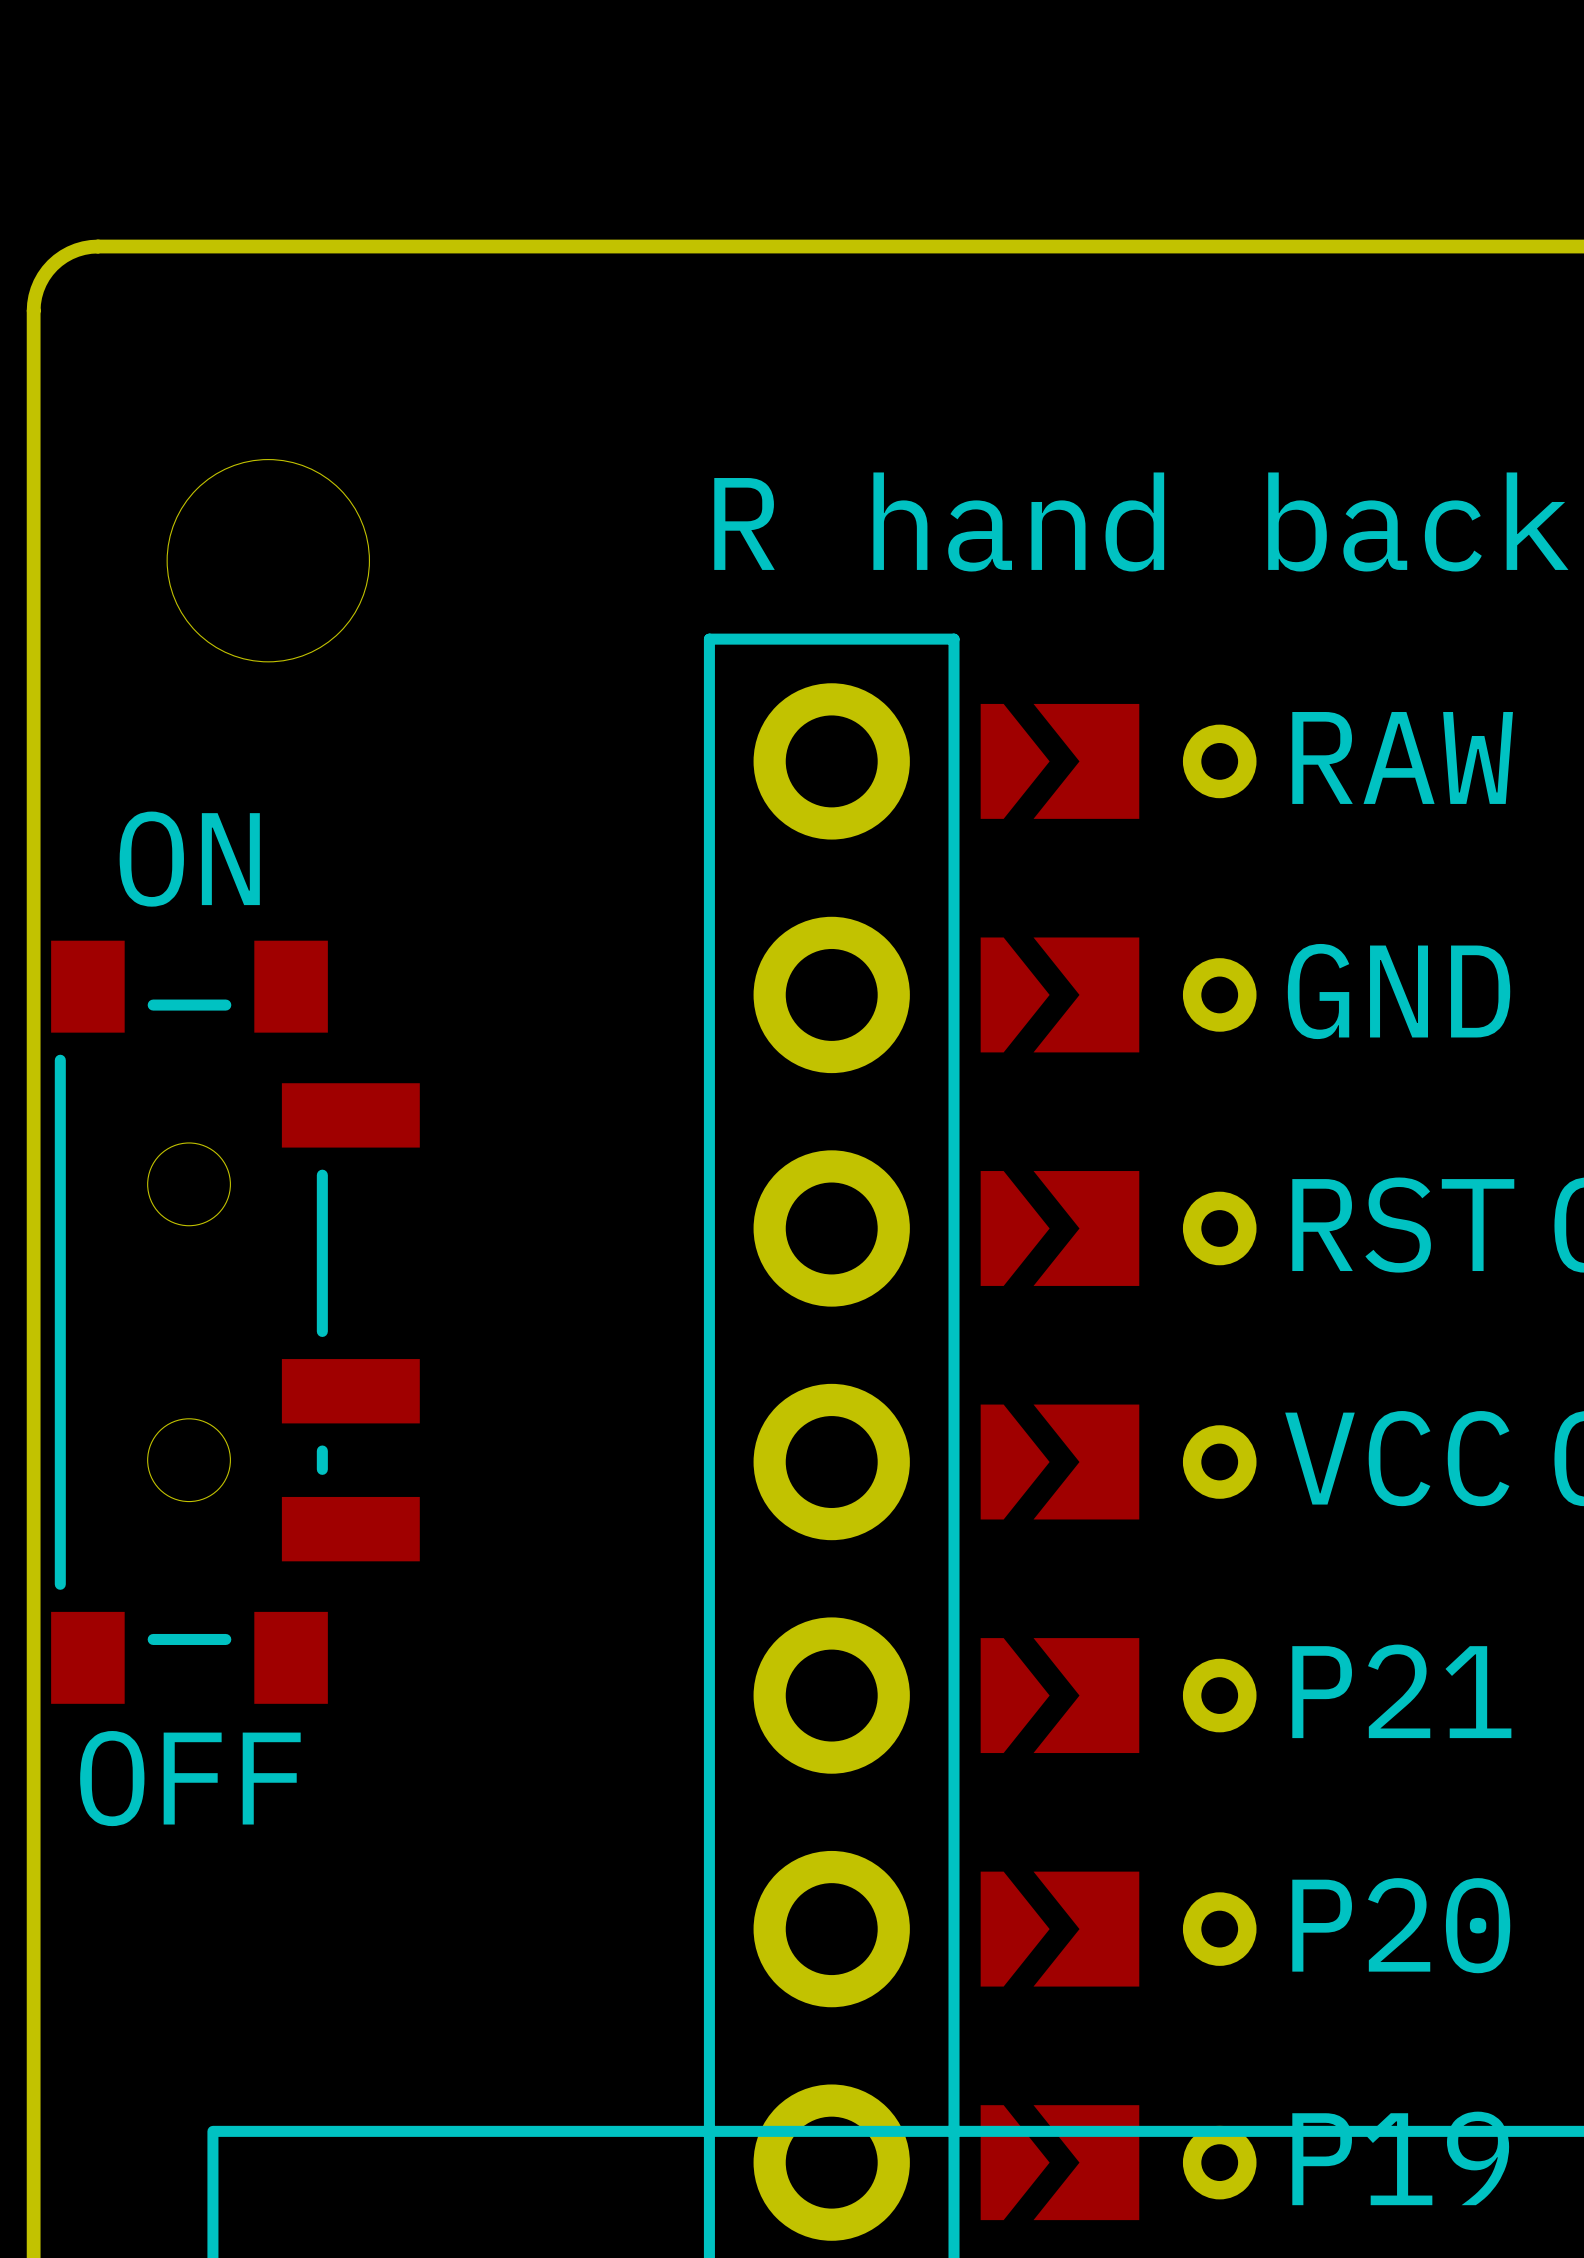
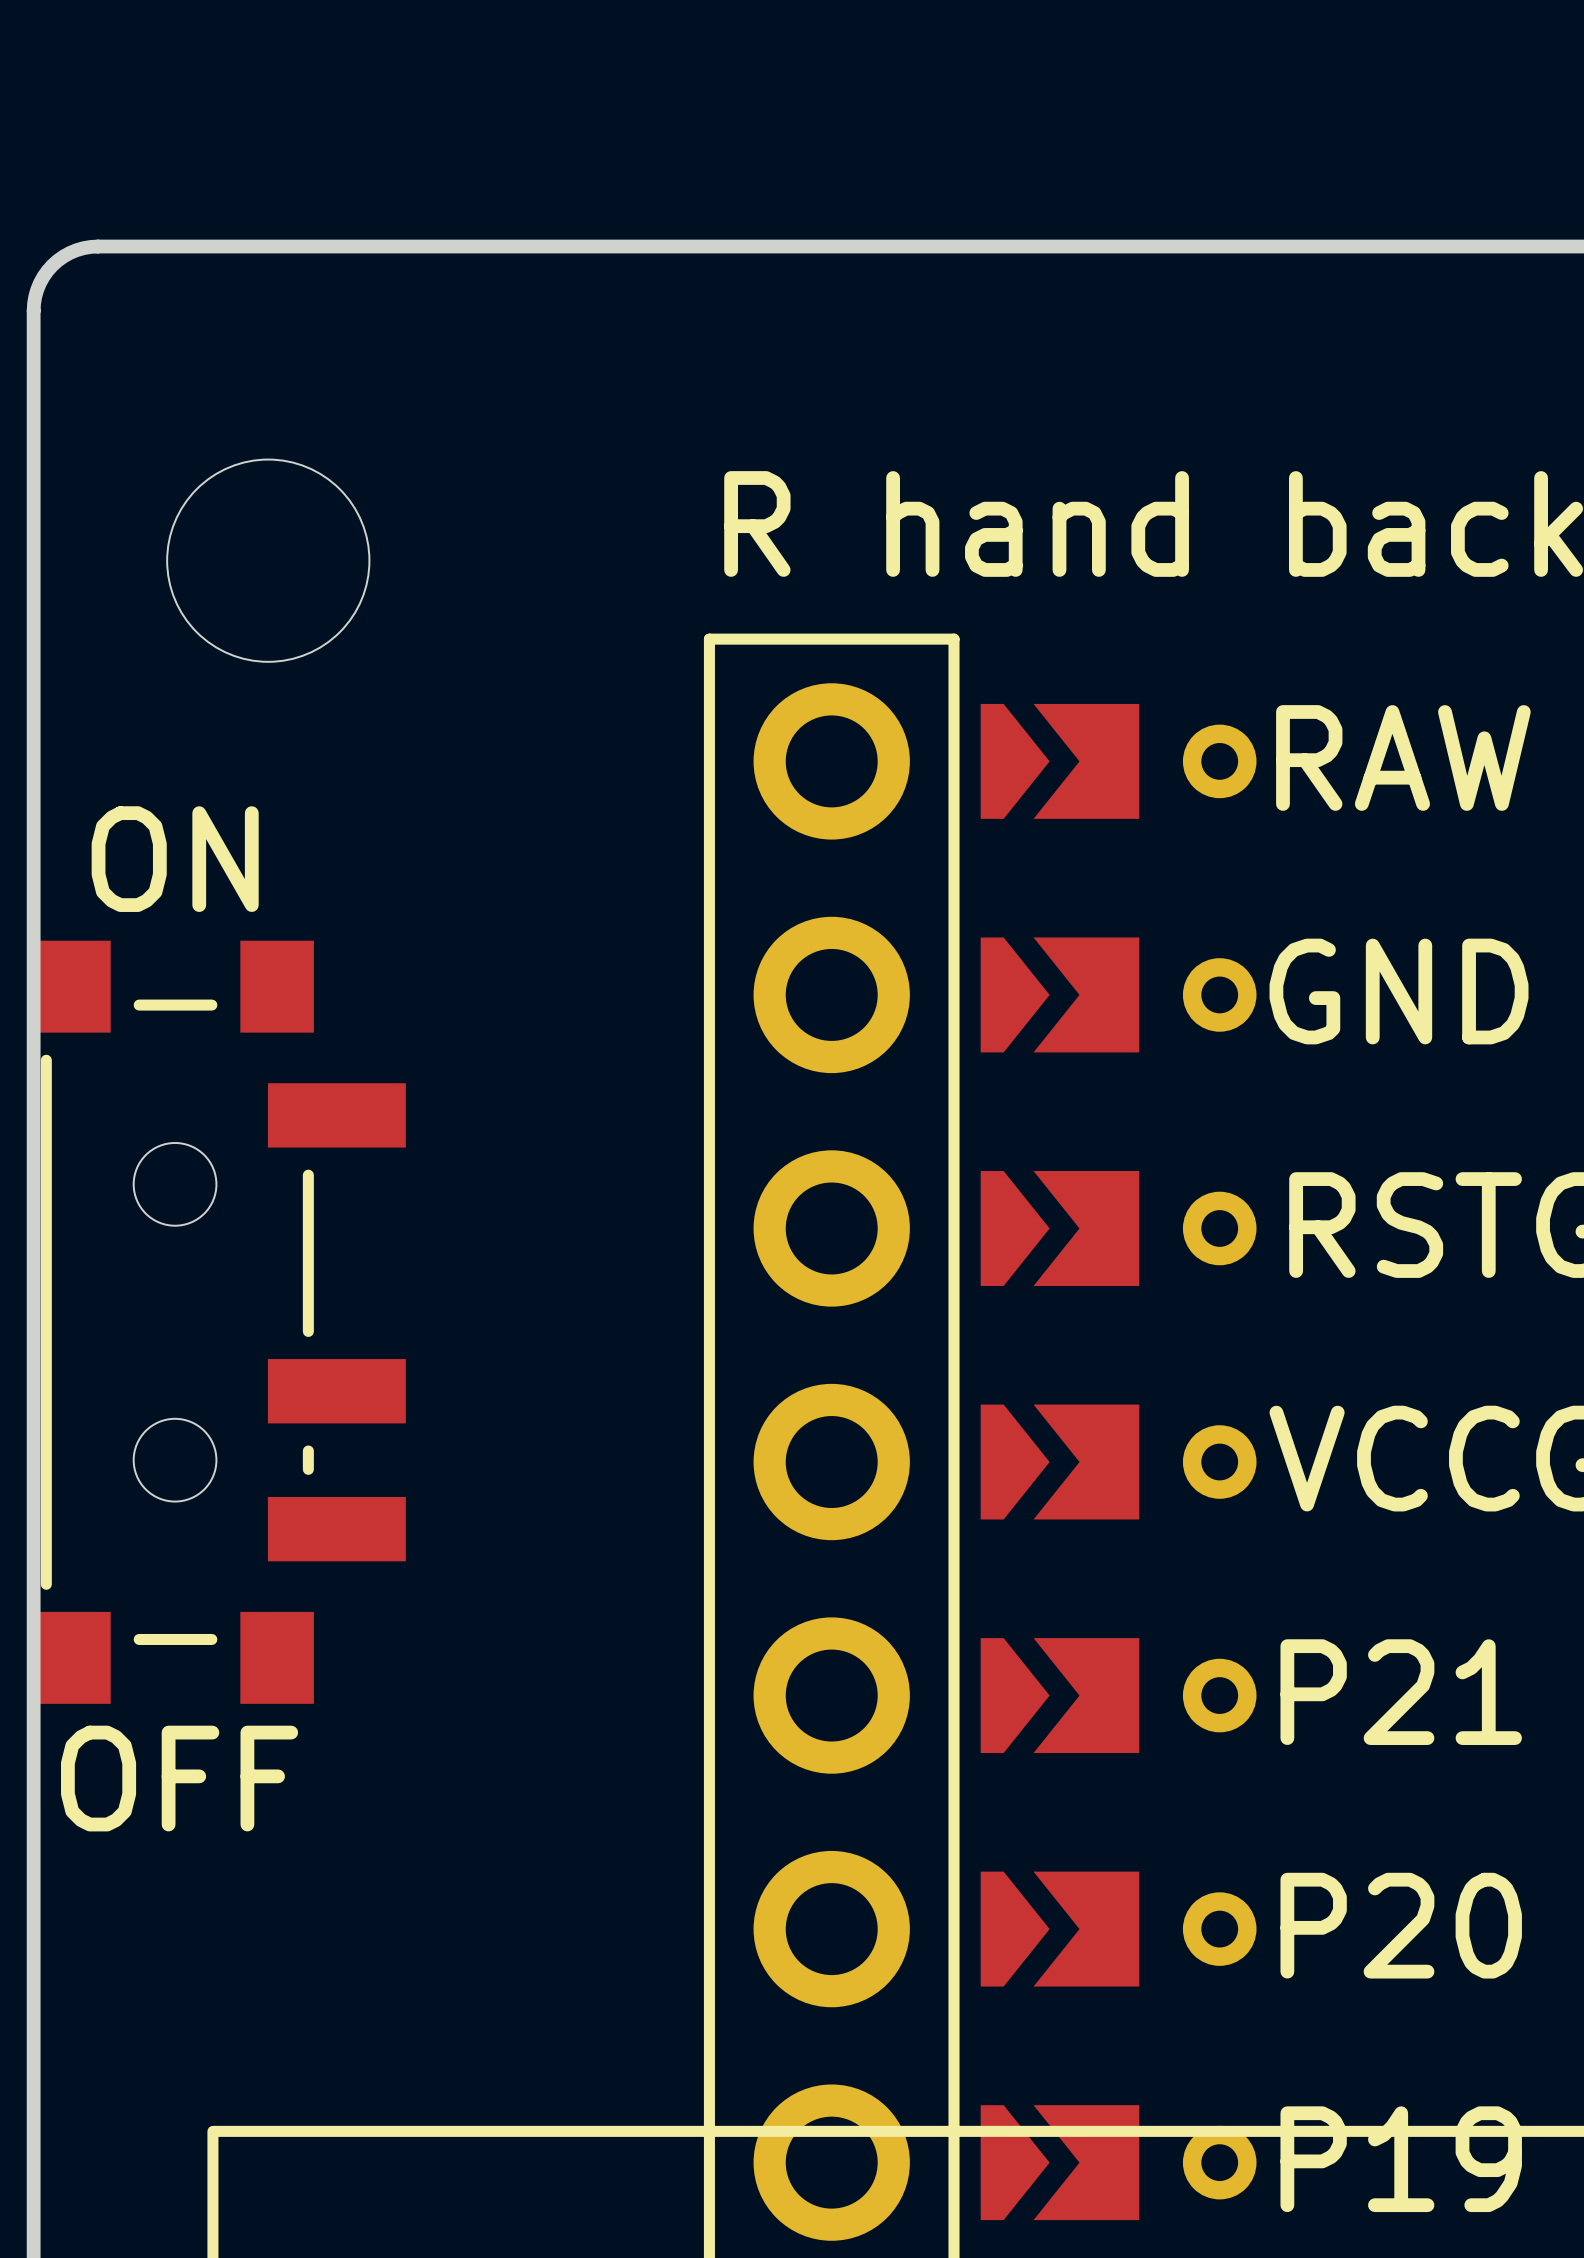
part position: (235, 1322) -> (221, 1322)

